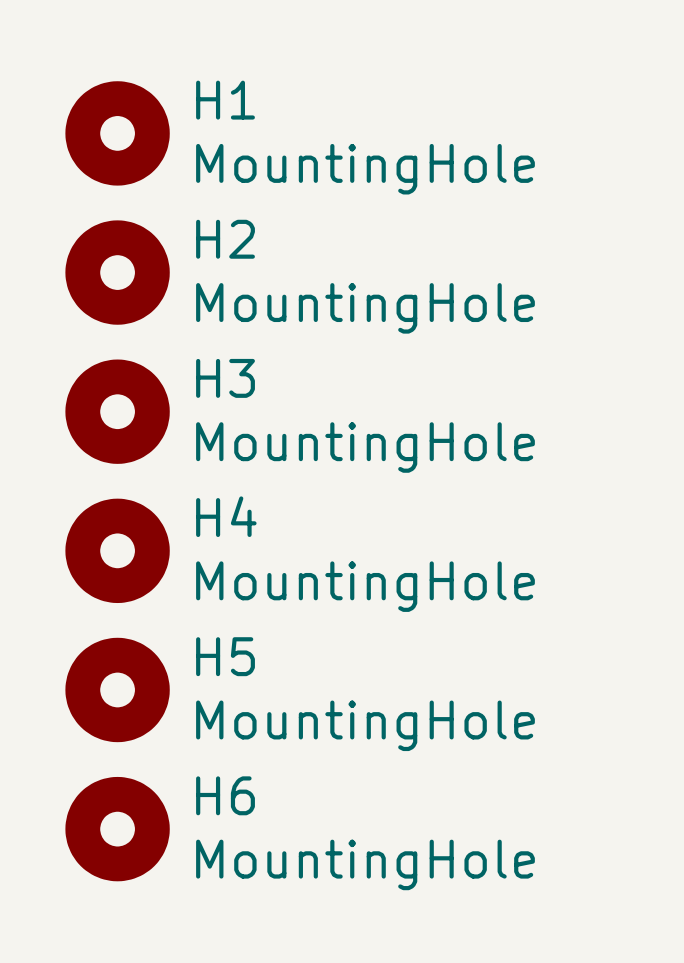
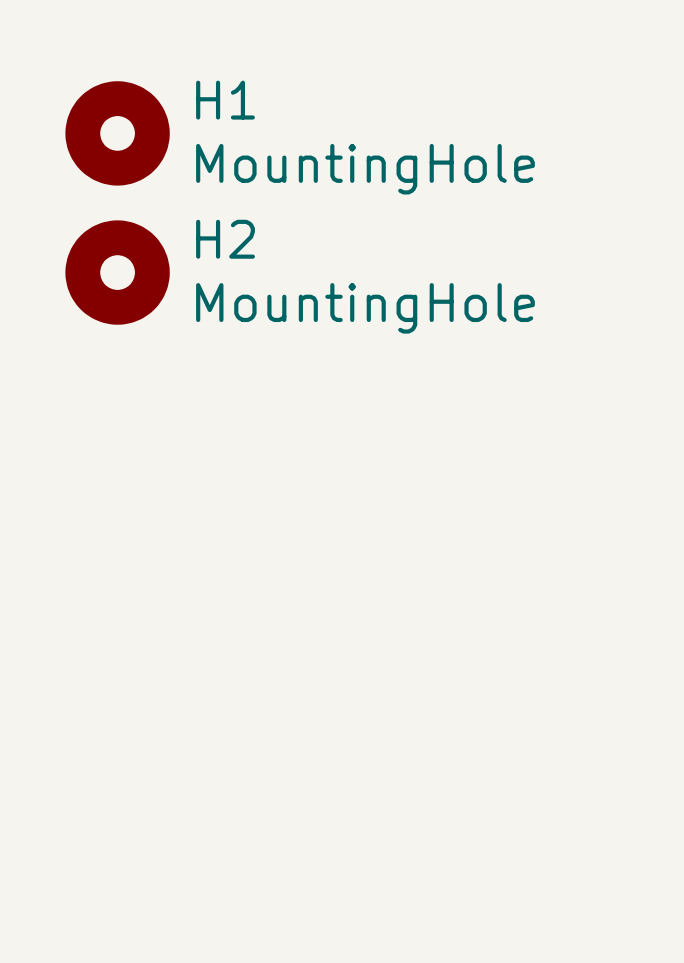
H3: MountingHole (117, 411) -> none
H4: MountingHole (117, 550) -> none
H5: MountingHole (117, 689) -> none
H6: MountingHole (117, 829) -> none

